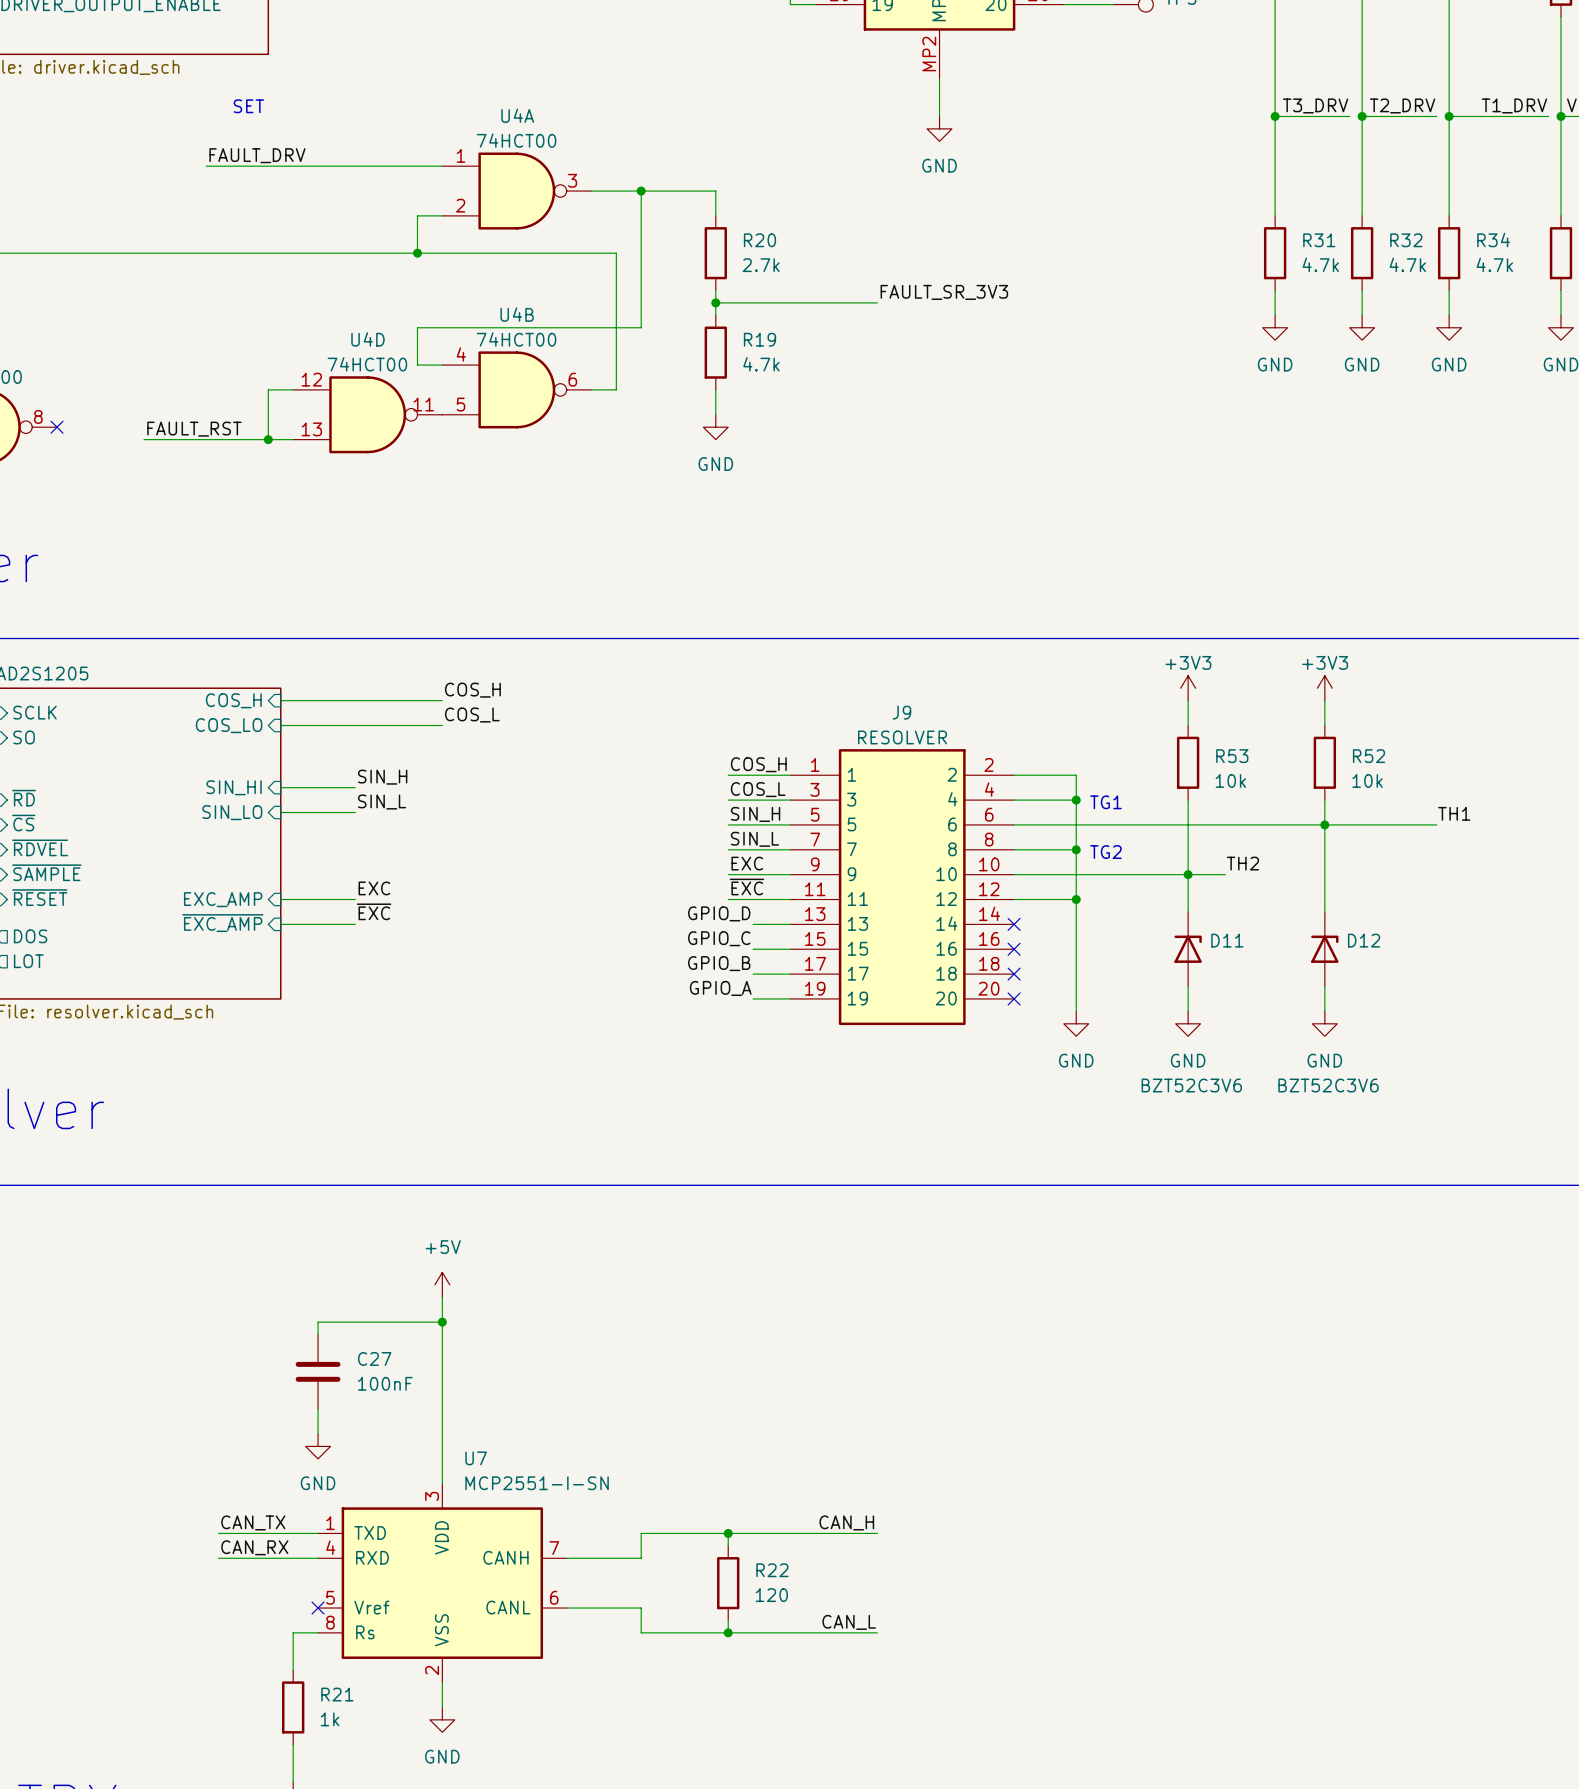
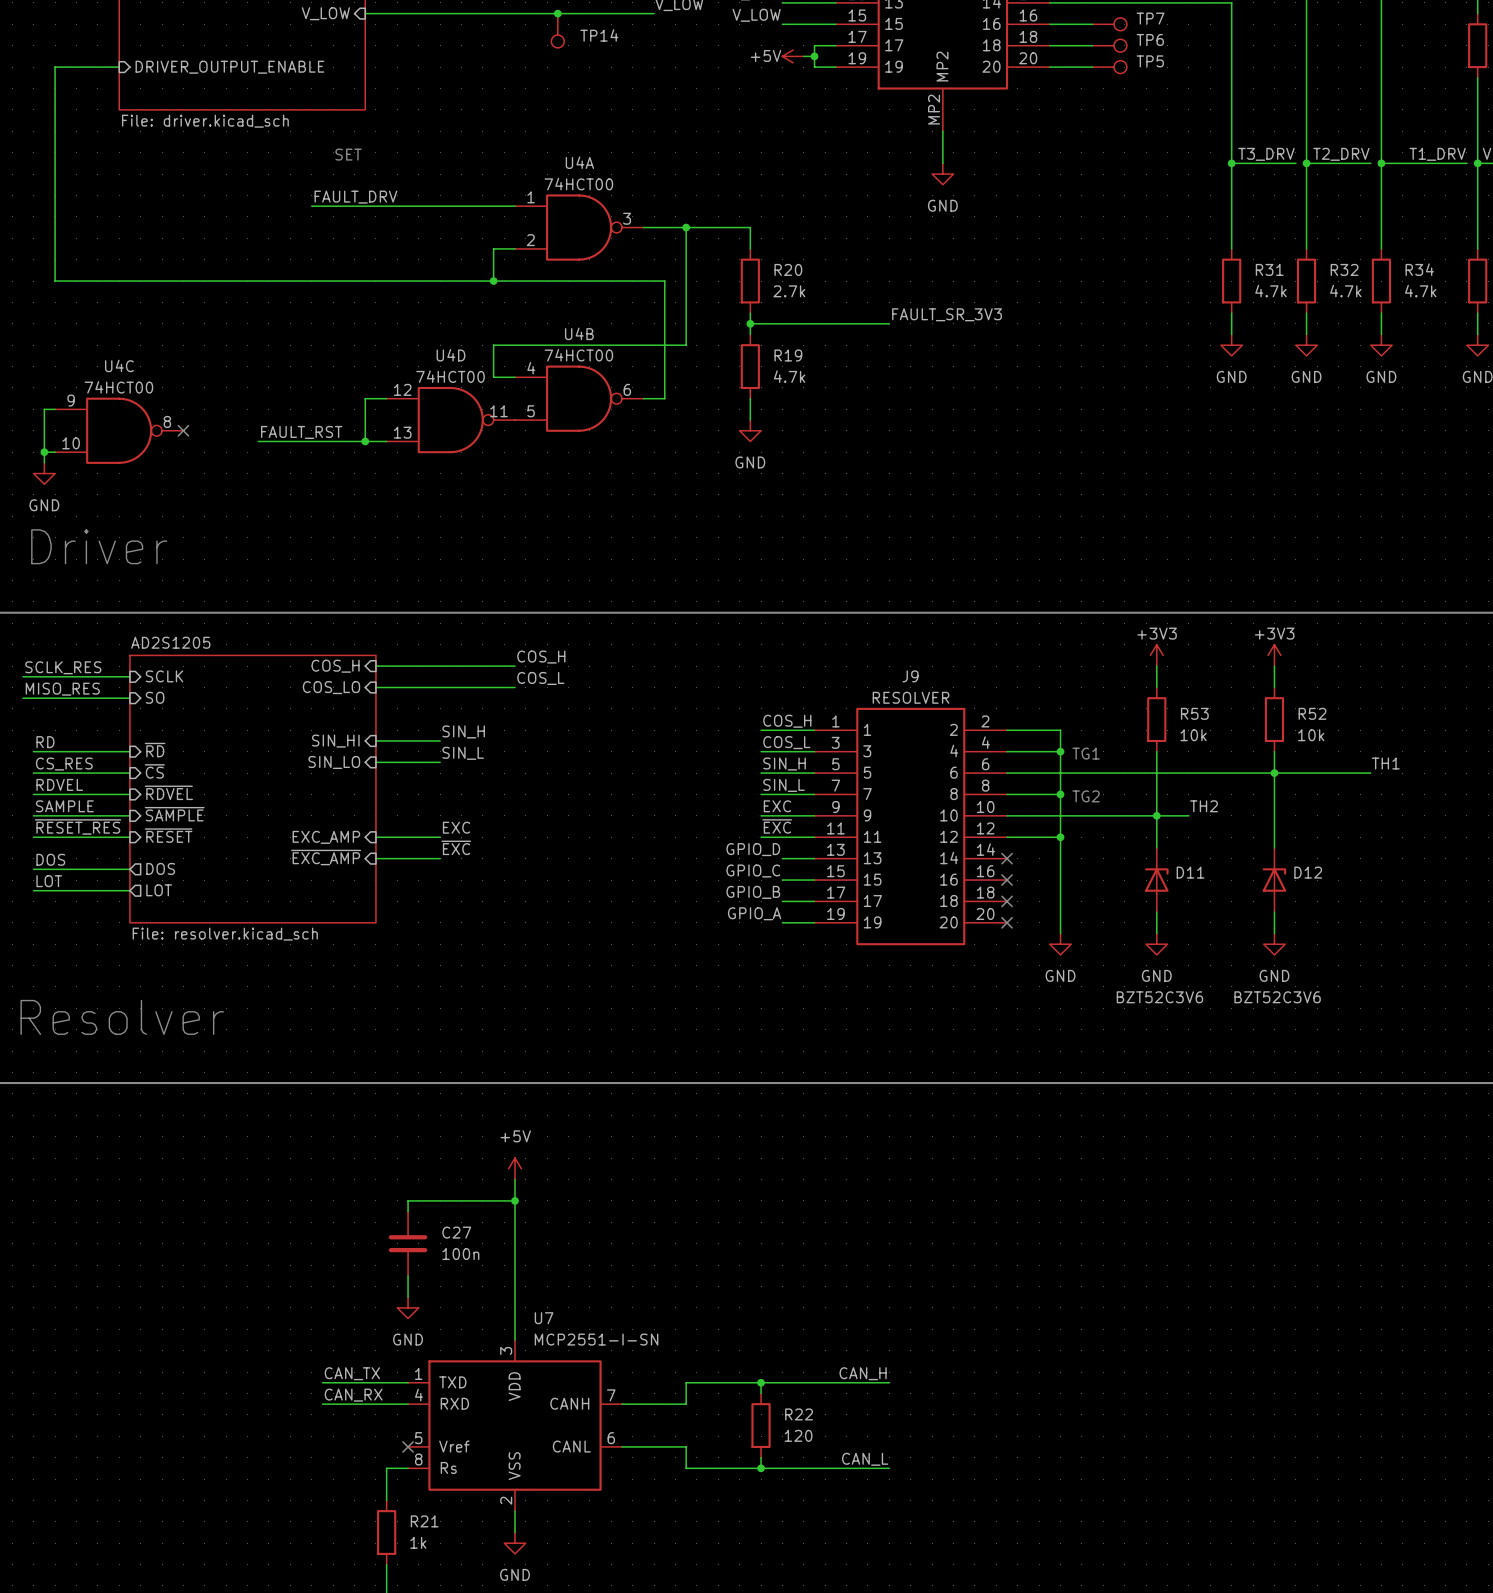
C27 value: 100nF (385, 1383) -> 100n (460, 1254)

